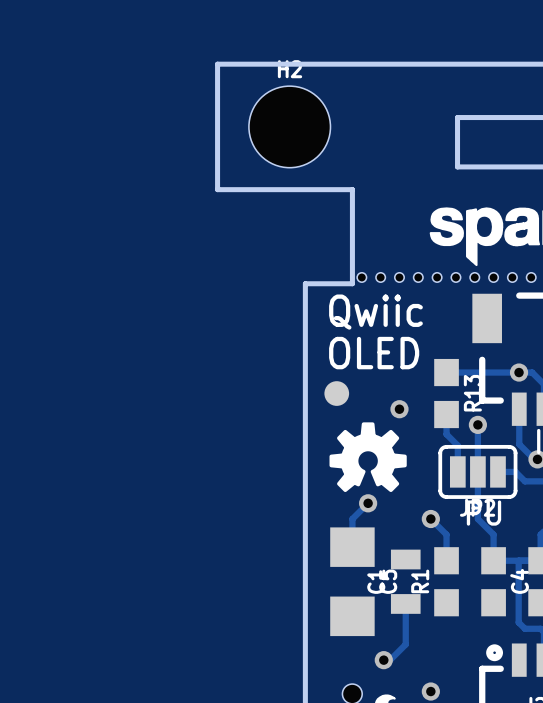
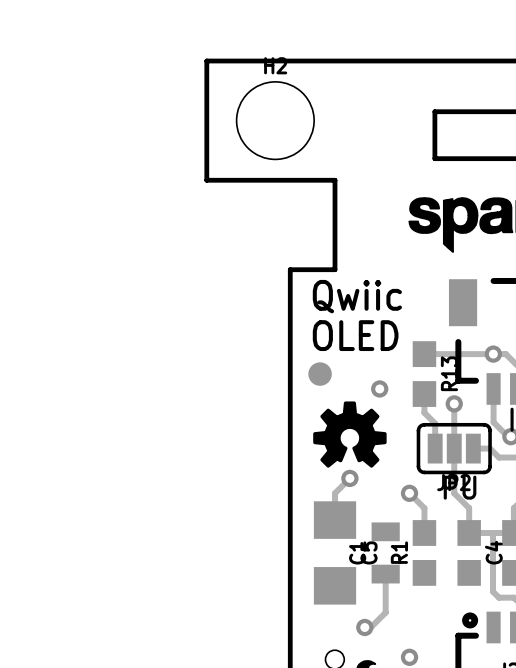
hole: (361, 277) -> none
hole: (380, 277) -> none
hole: (399, 277) -> none
hole: (418, 277) -> none
hole: (437, 277) -> none
hole: (455, 277) -> none
hole: (474, 277) -> none
hole: (493, 277) -> none
hole: (512, 277) -> none
hole: (531, 277) -> none

